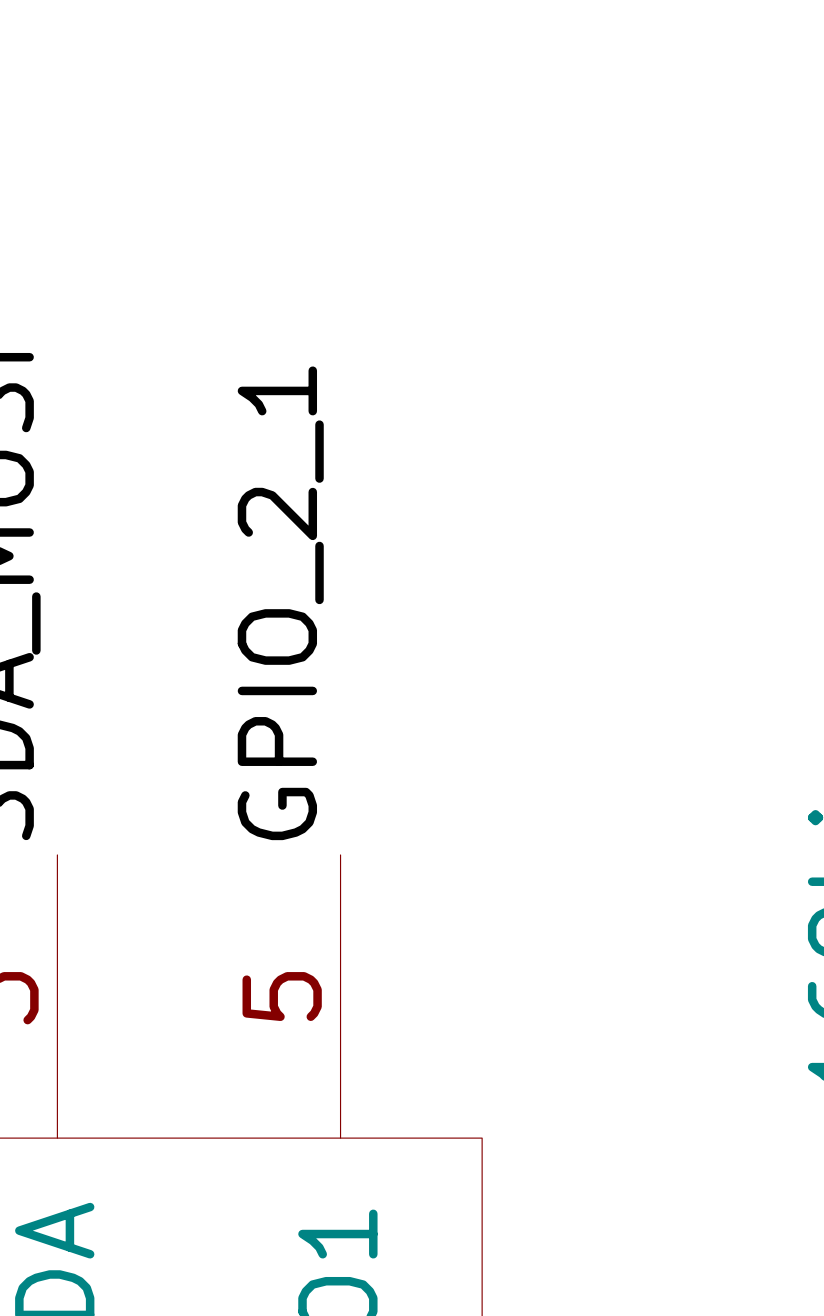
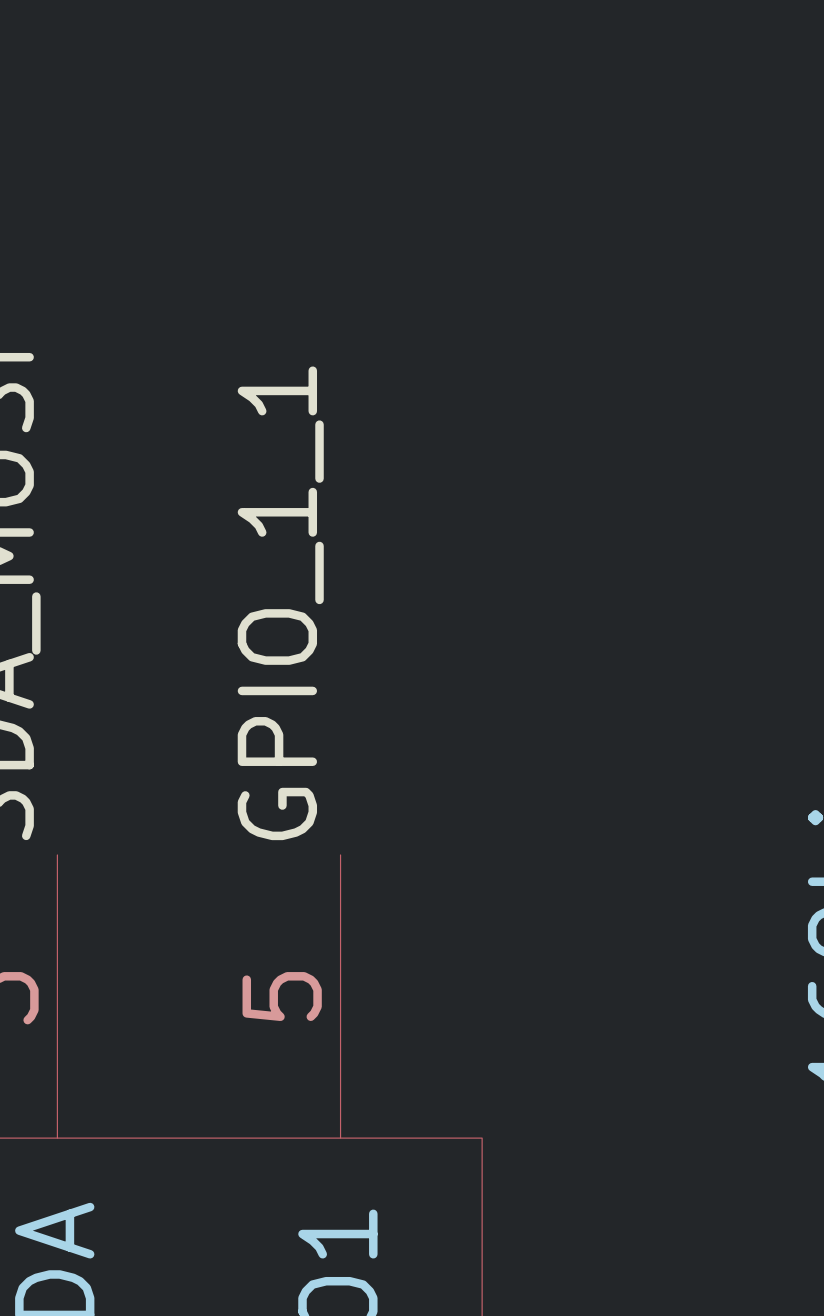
label: GPIO_2_1 (280, 603) -> GPIO_1_1 (280, 603)

